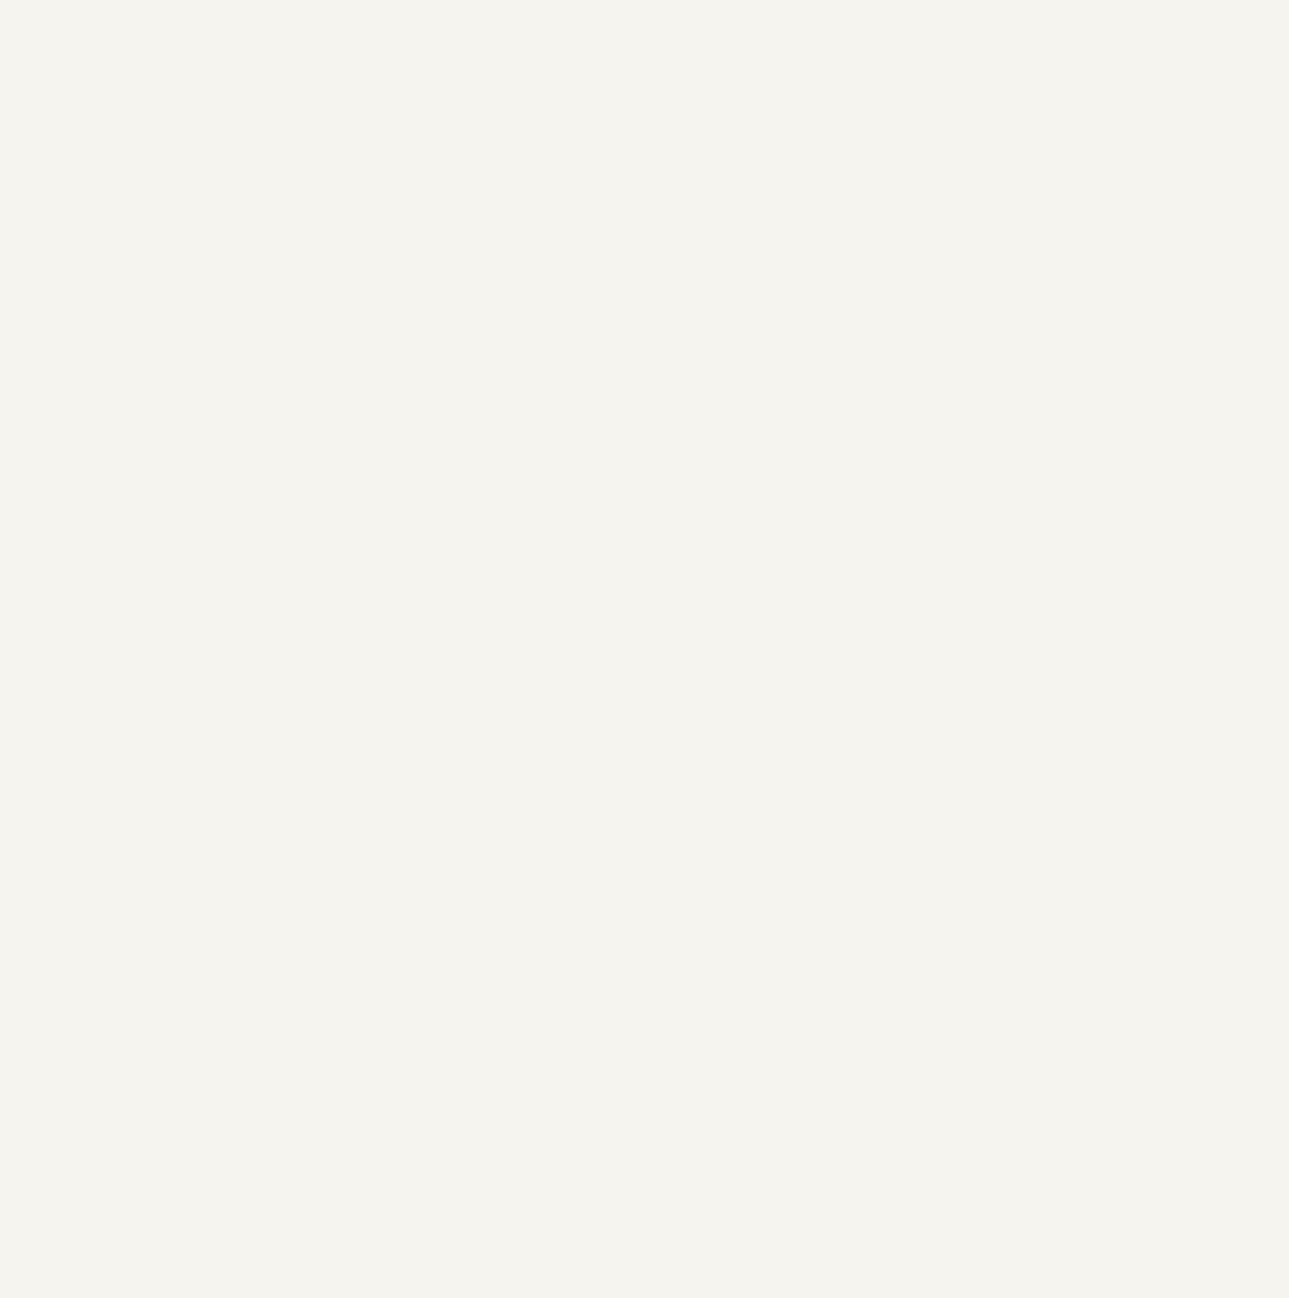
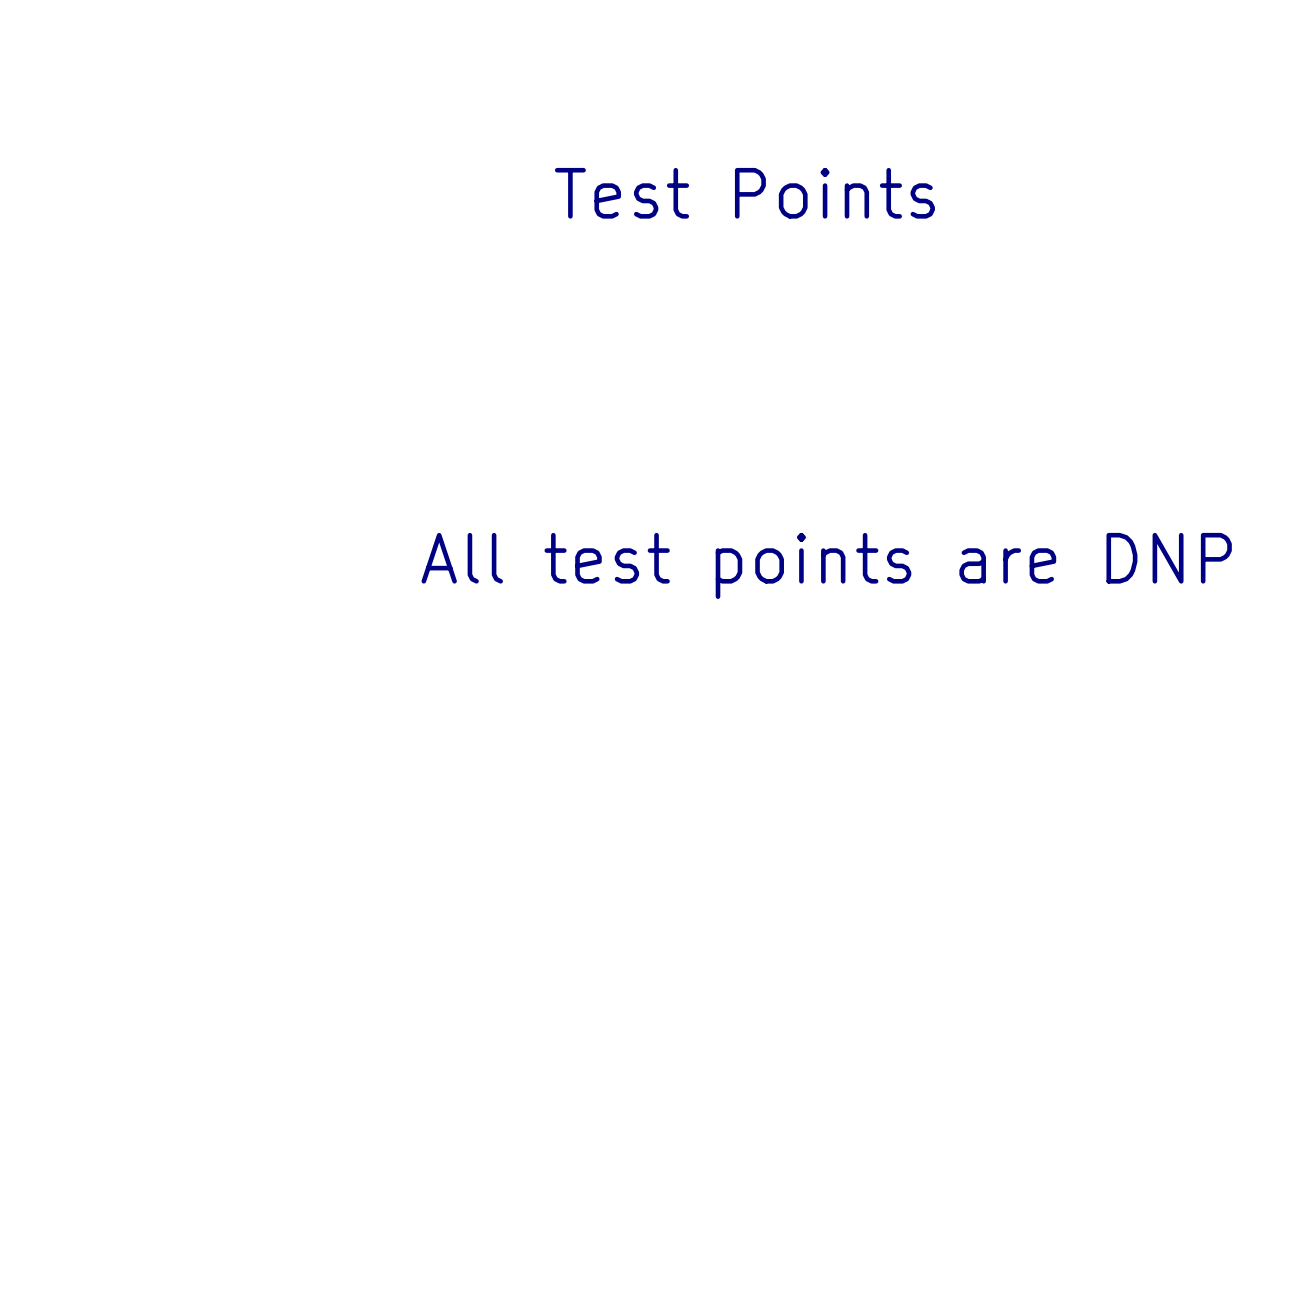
text: none -> Test Points (744, 193)
text: none -> All test points are DNP (826, 565)

